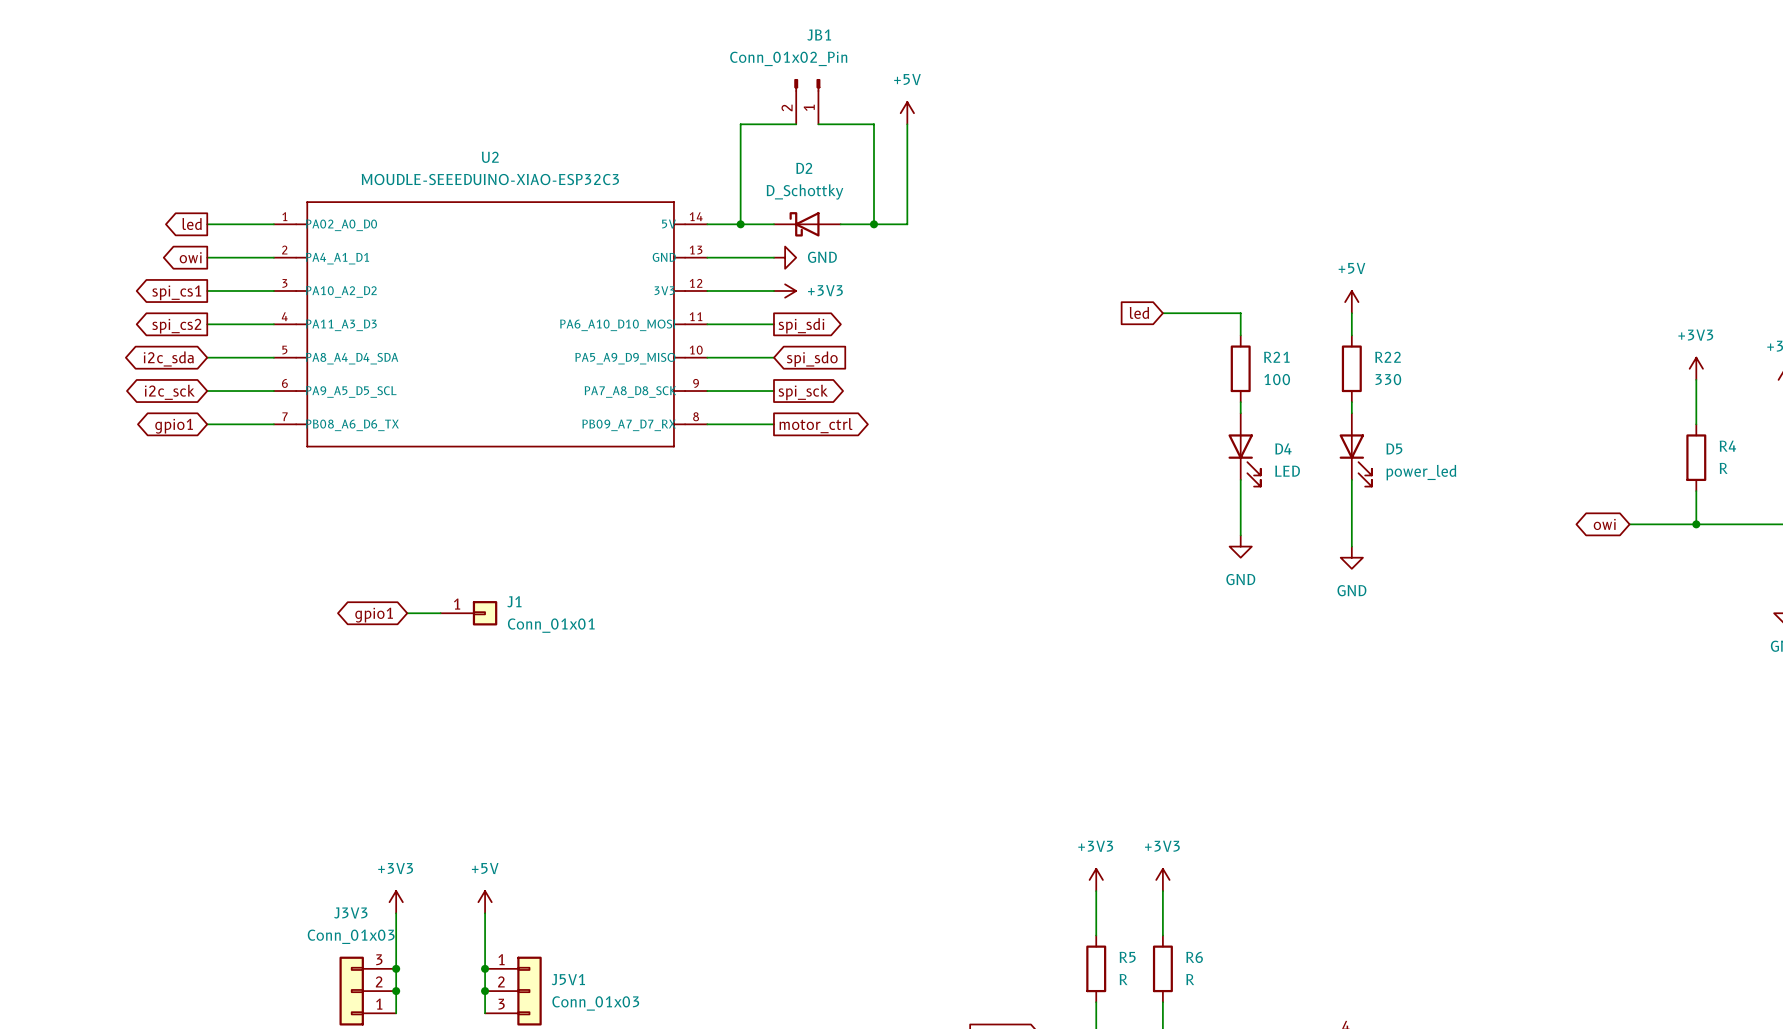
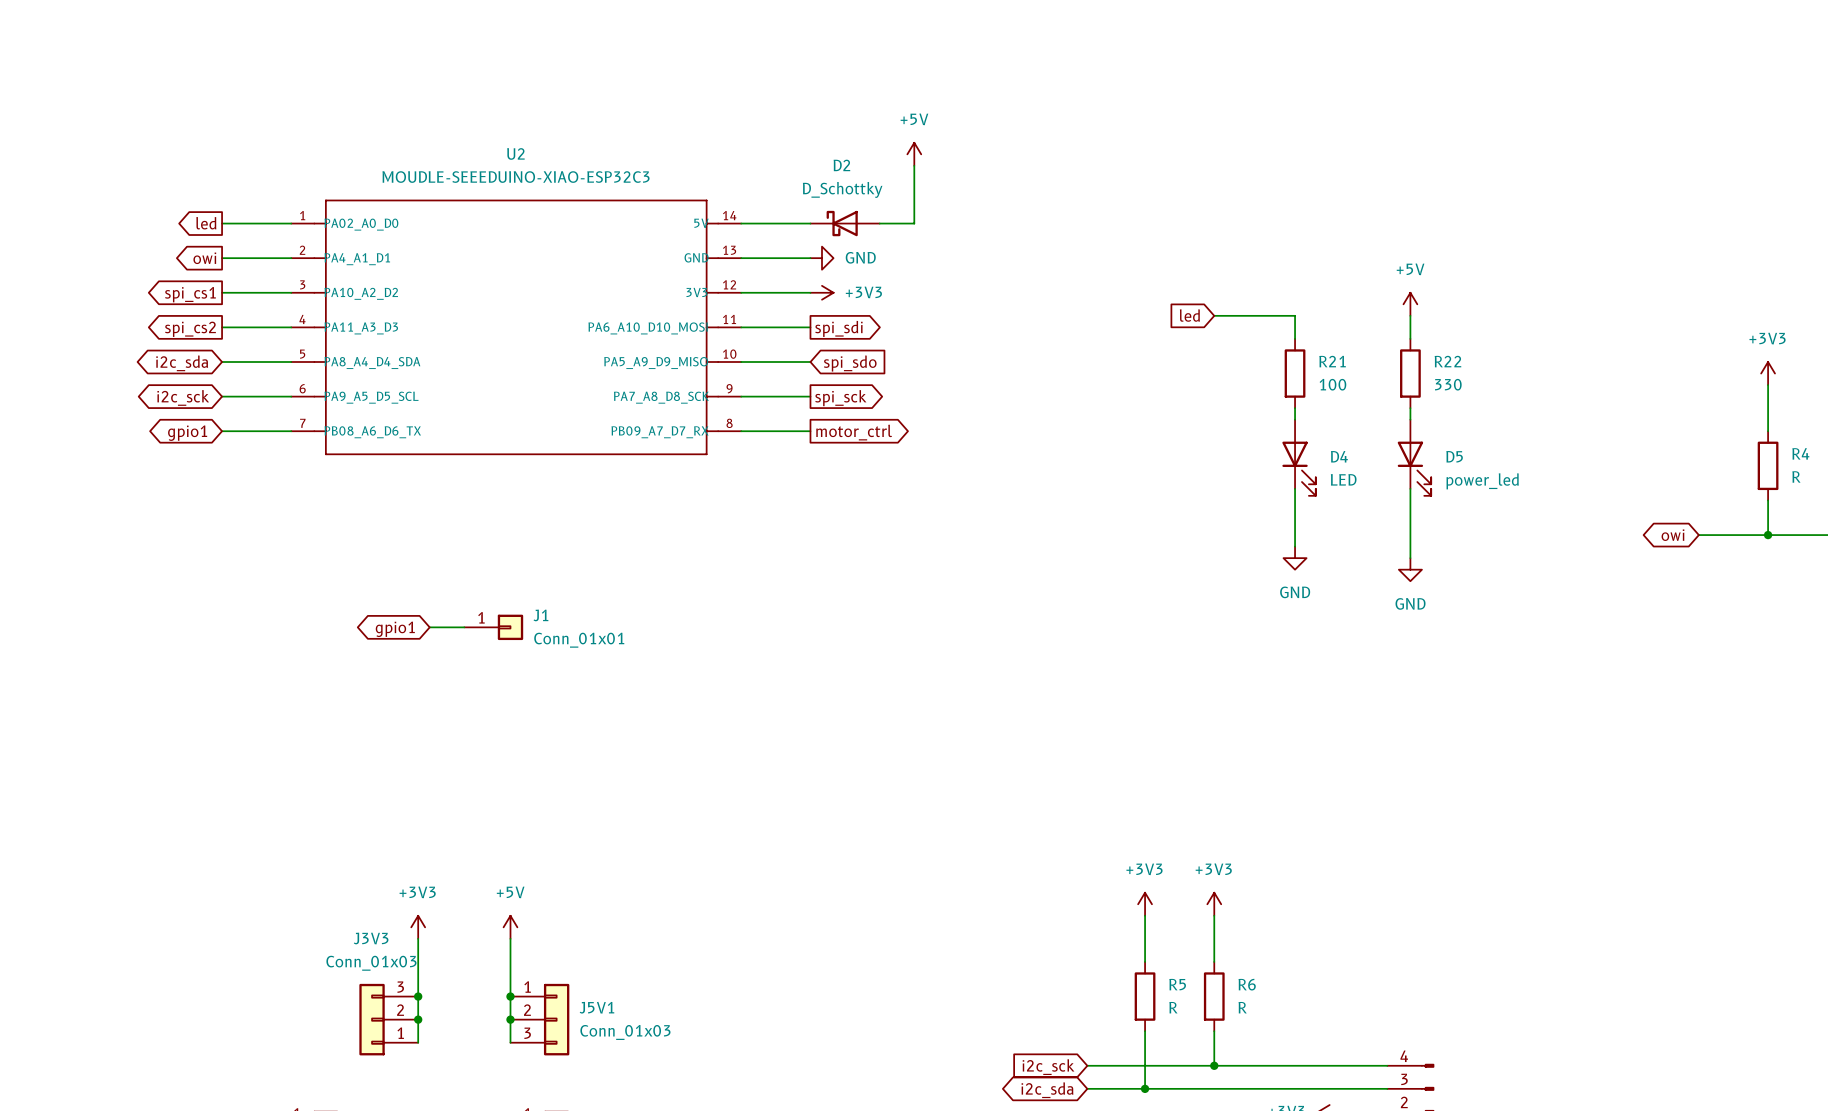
JB1: Conn_01x02_Pin (807, 101) -> none
power symbol position: +5V (907, 113) -> +5V (914, 154)
wire: (796, 124) (740, 124) (740, 224) -> none
wire: (818, 124) (873, 124) (873, 168) -> none
wire: (907, 124) (907, 224) (873, 224) -> none
junction: (740, 224) -> none
junction: (873, 224) -> none

